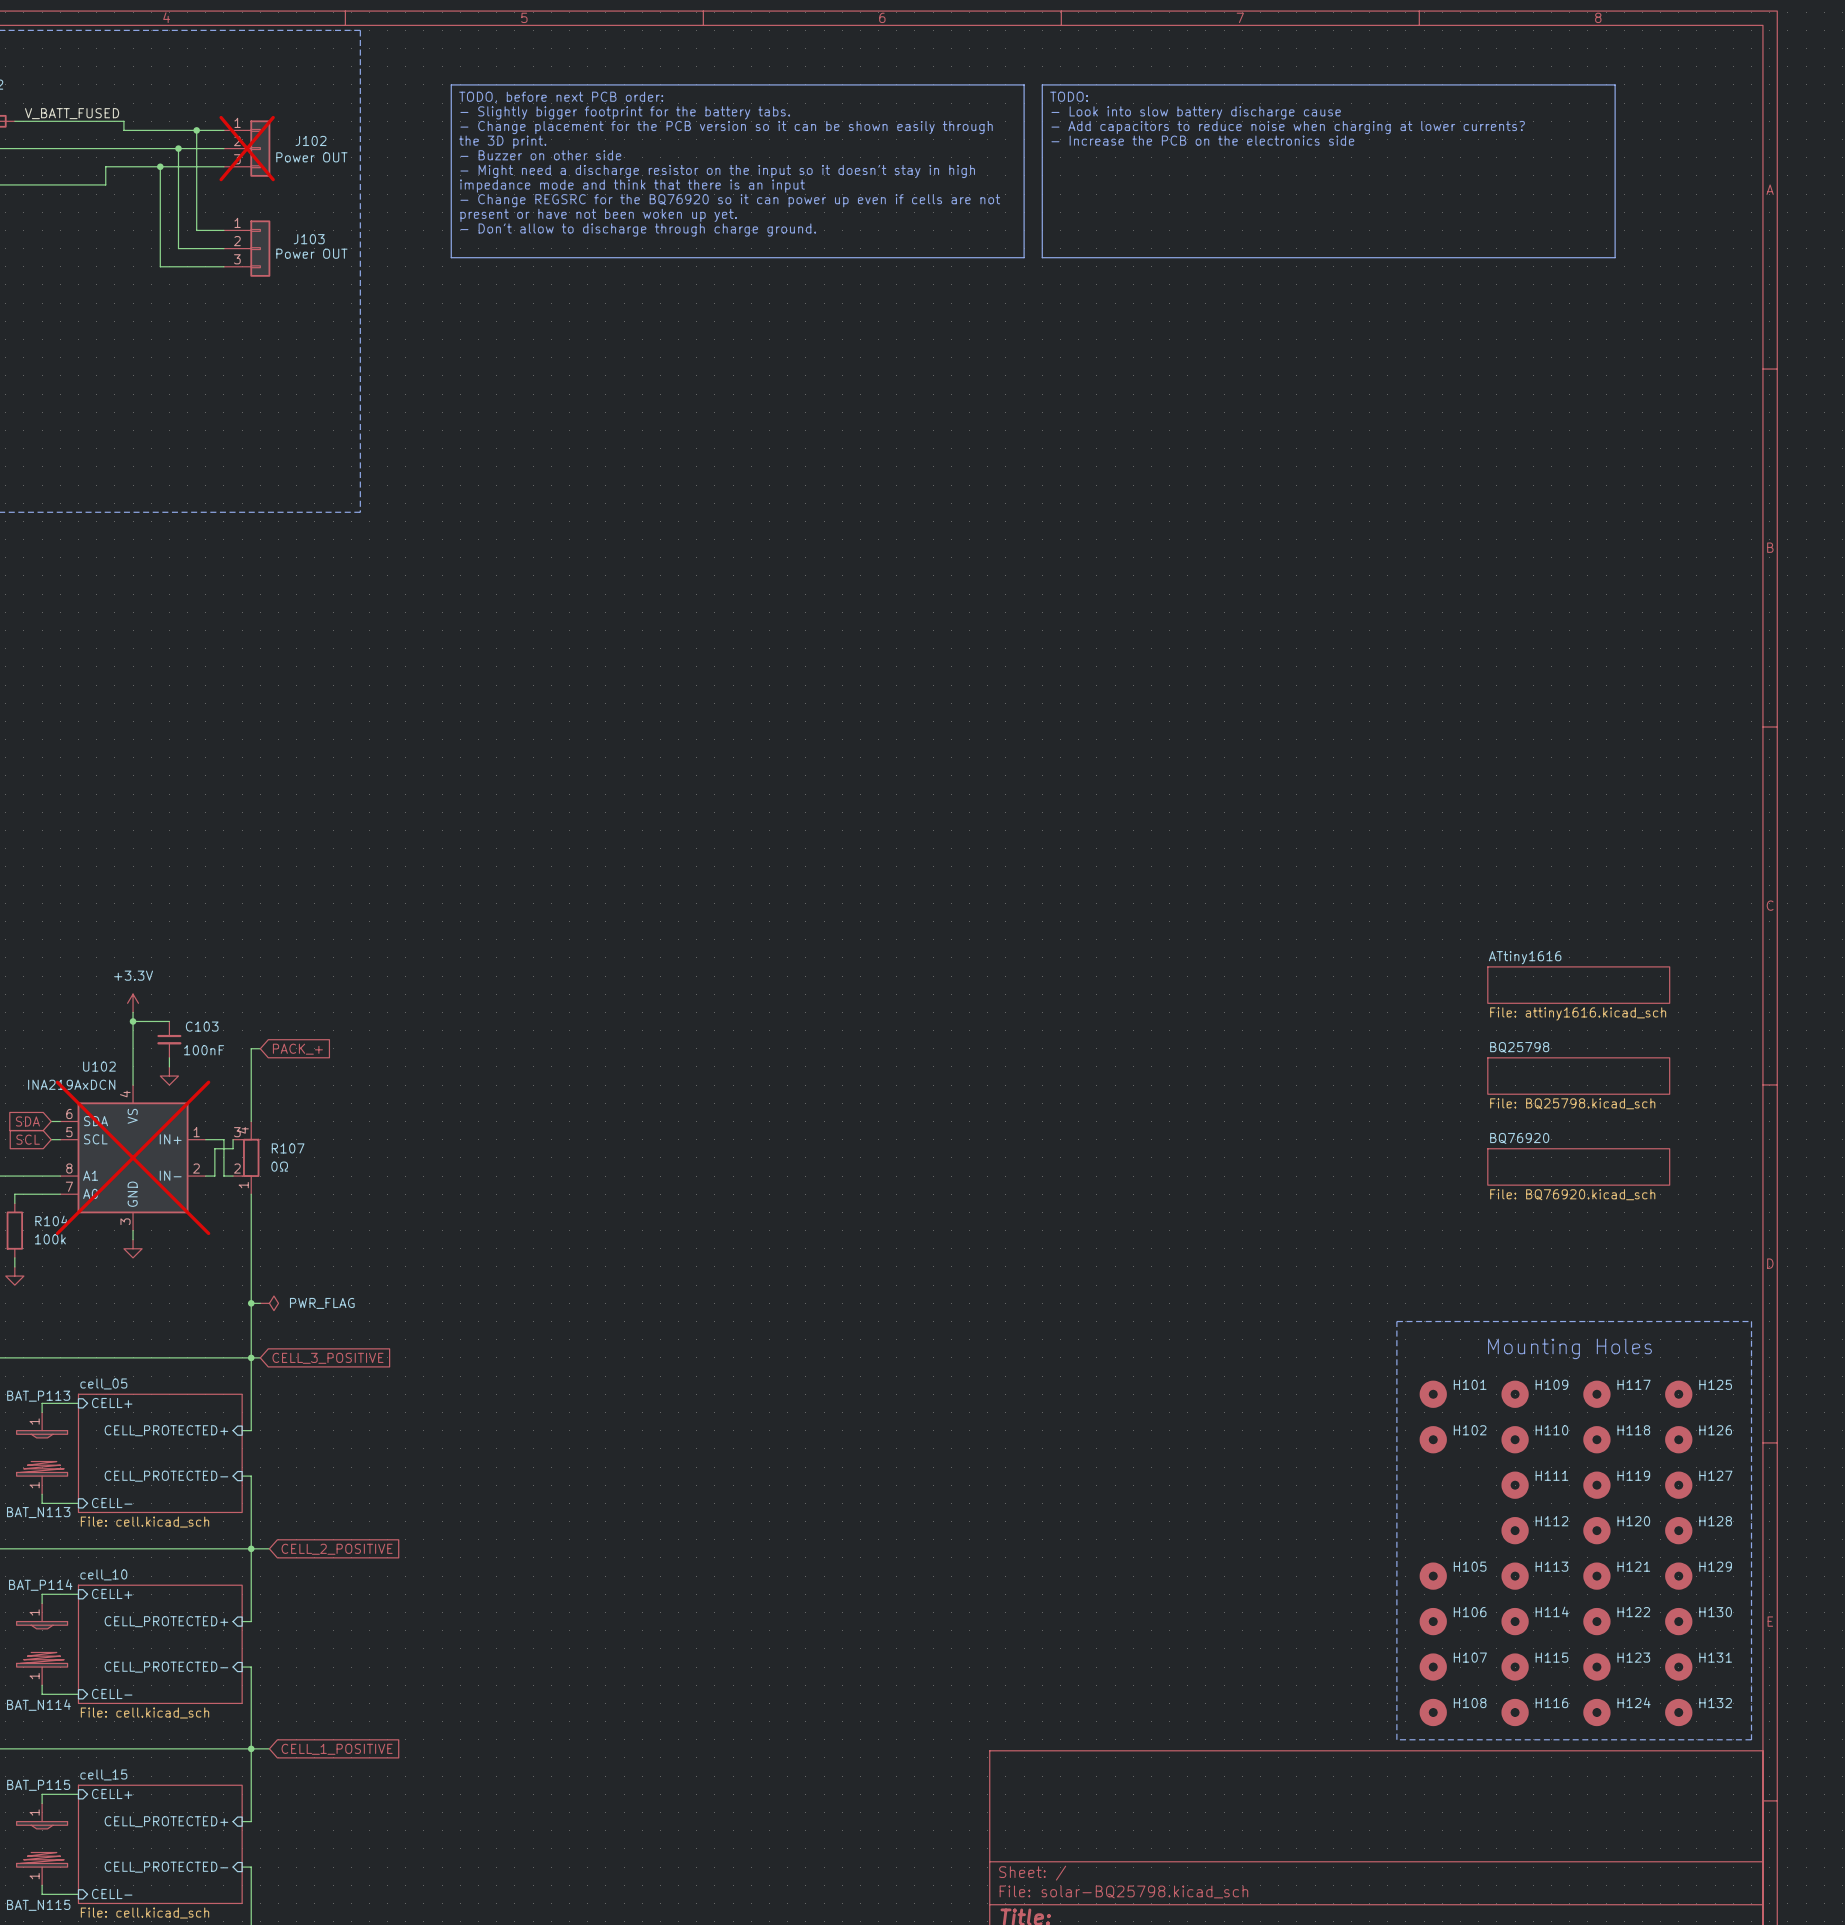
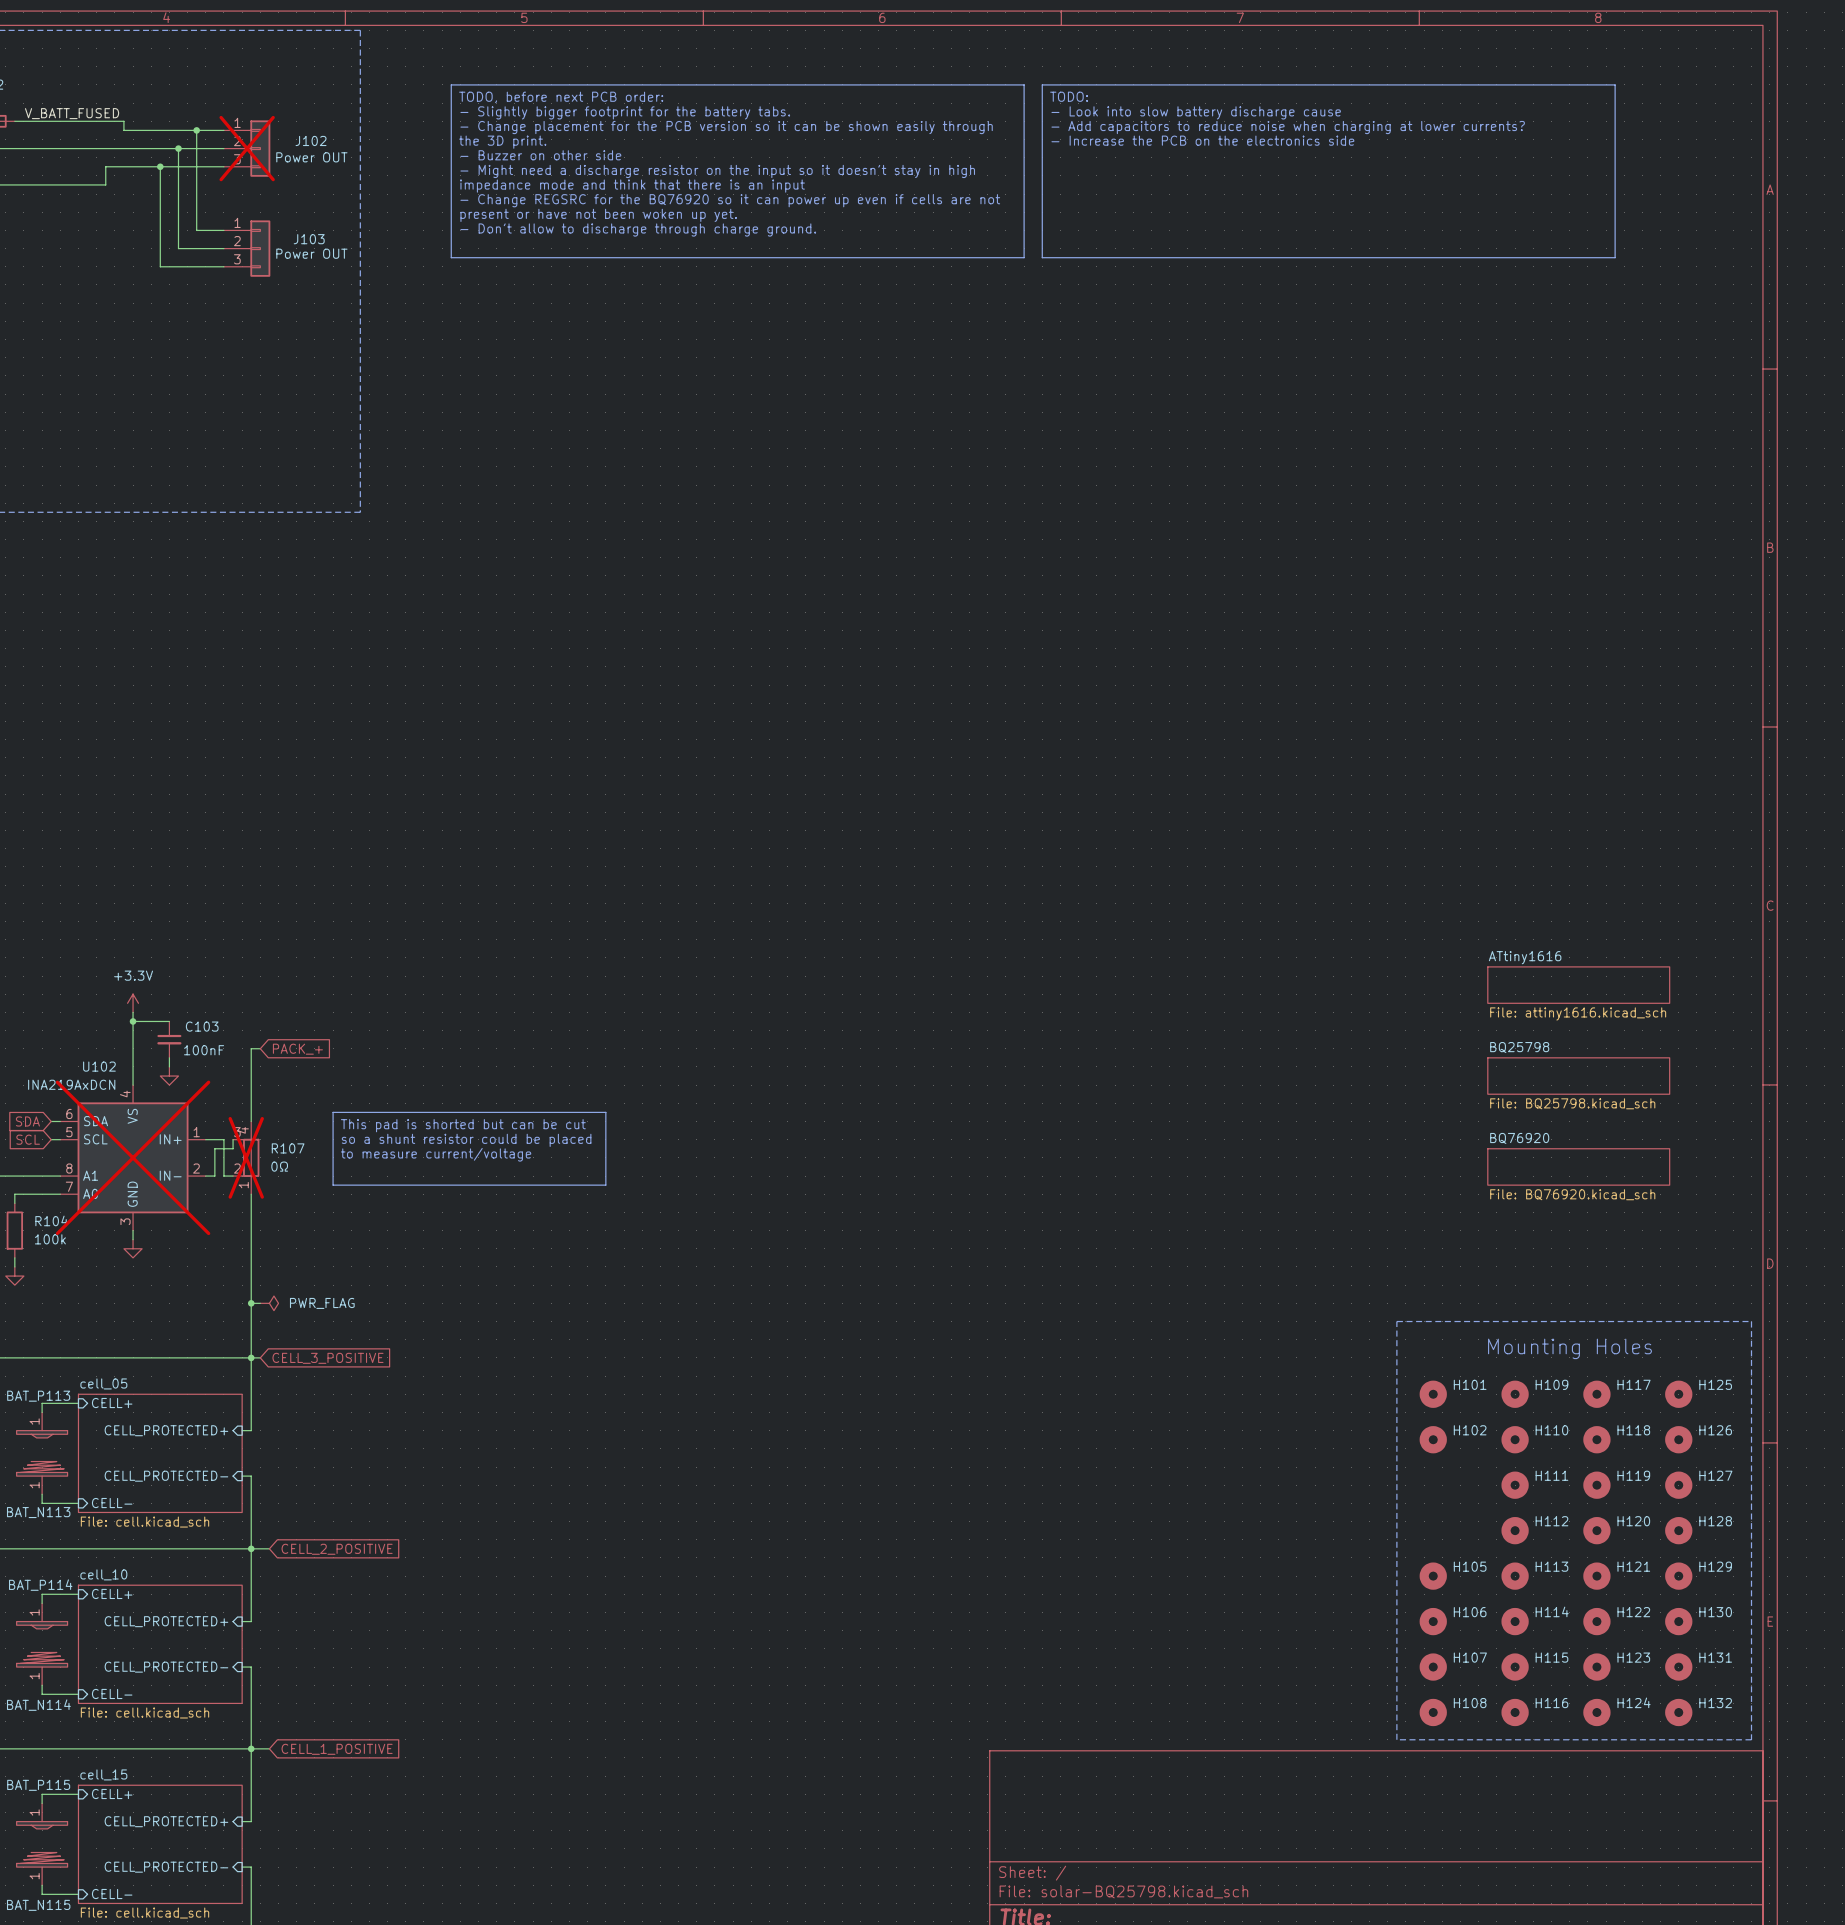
line: none -> (333, 1112) (605, 1112) (605, 1185) (333, 1185) (333, 1112)
R107 symbol: [233, 1121, 260, 1195] -> [233, 1121, 260, 1195]
text: none -> This pad is shorted but can be cut (463, 1125)
text: none -> so a shunt resistor could be placed (466, 1140)
text: none -> to measure current/voltage (436, 1154)
R107 do-not-place cross: none -> (246, 1157)

